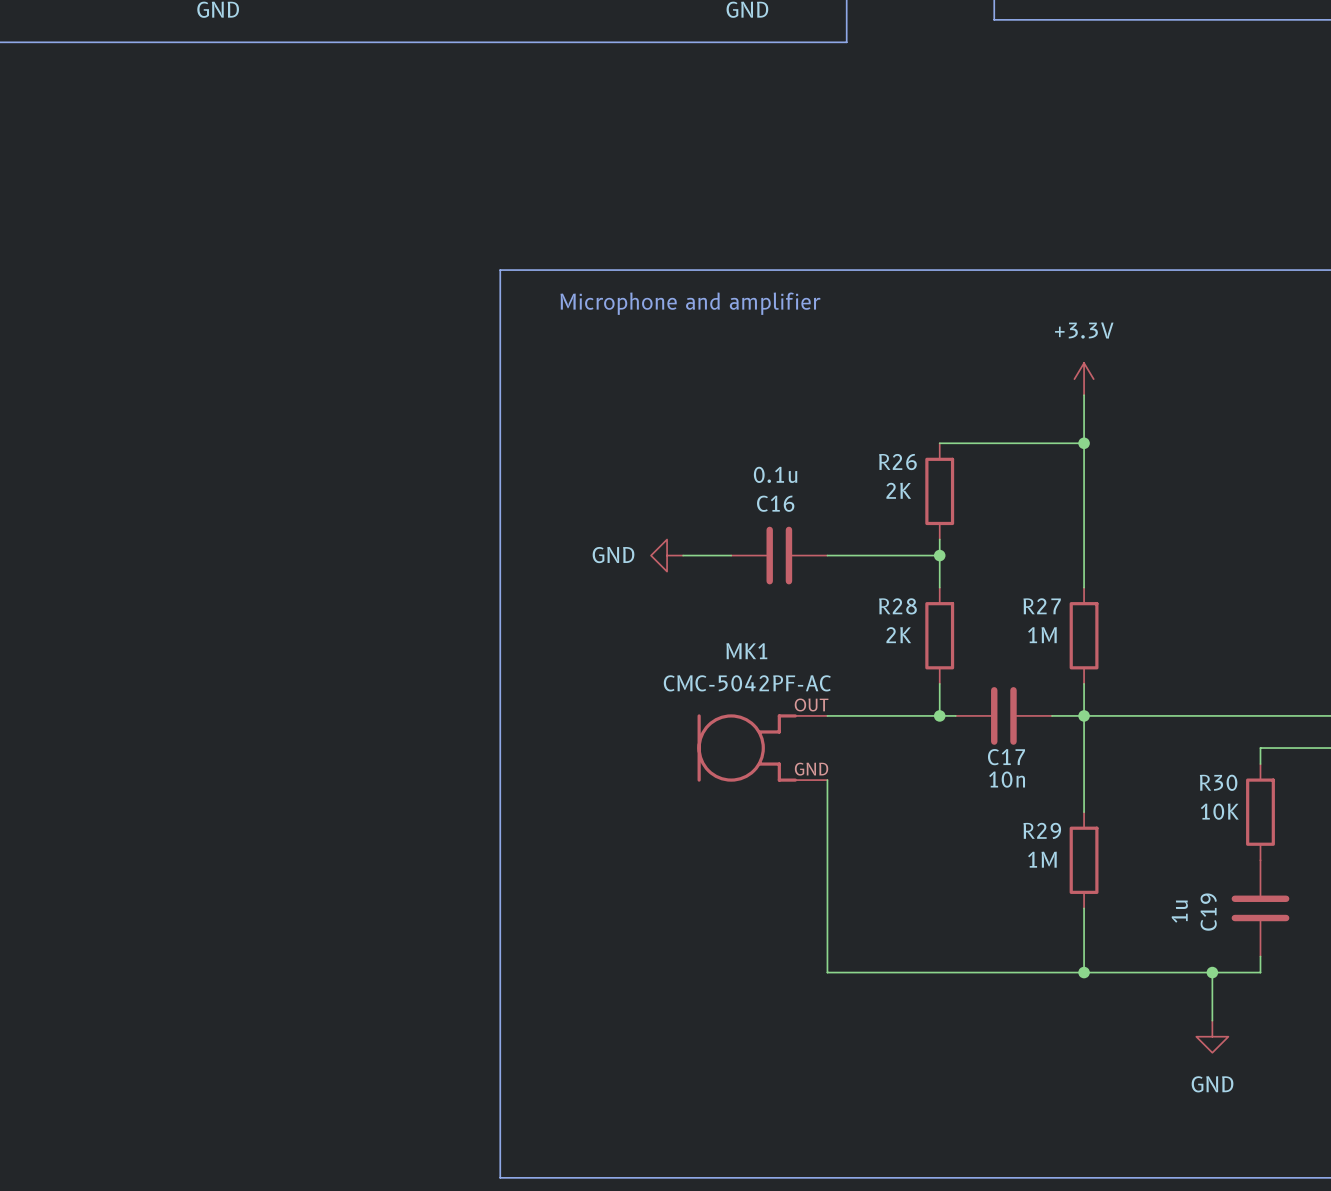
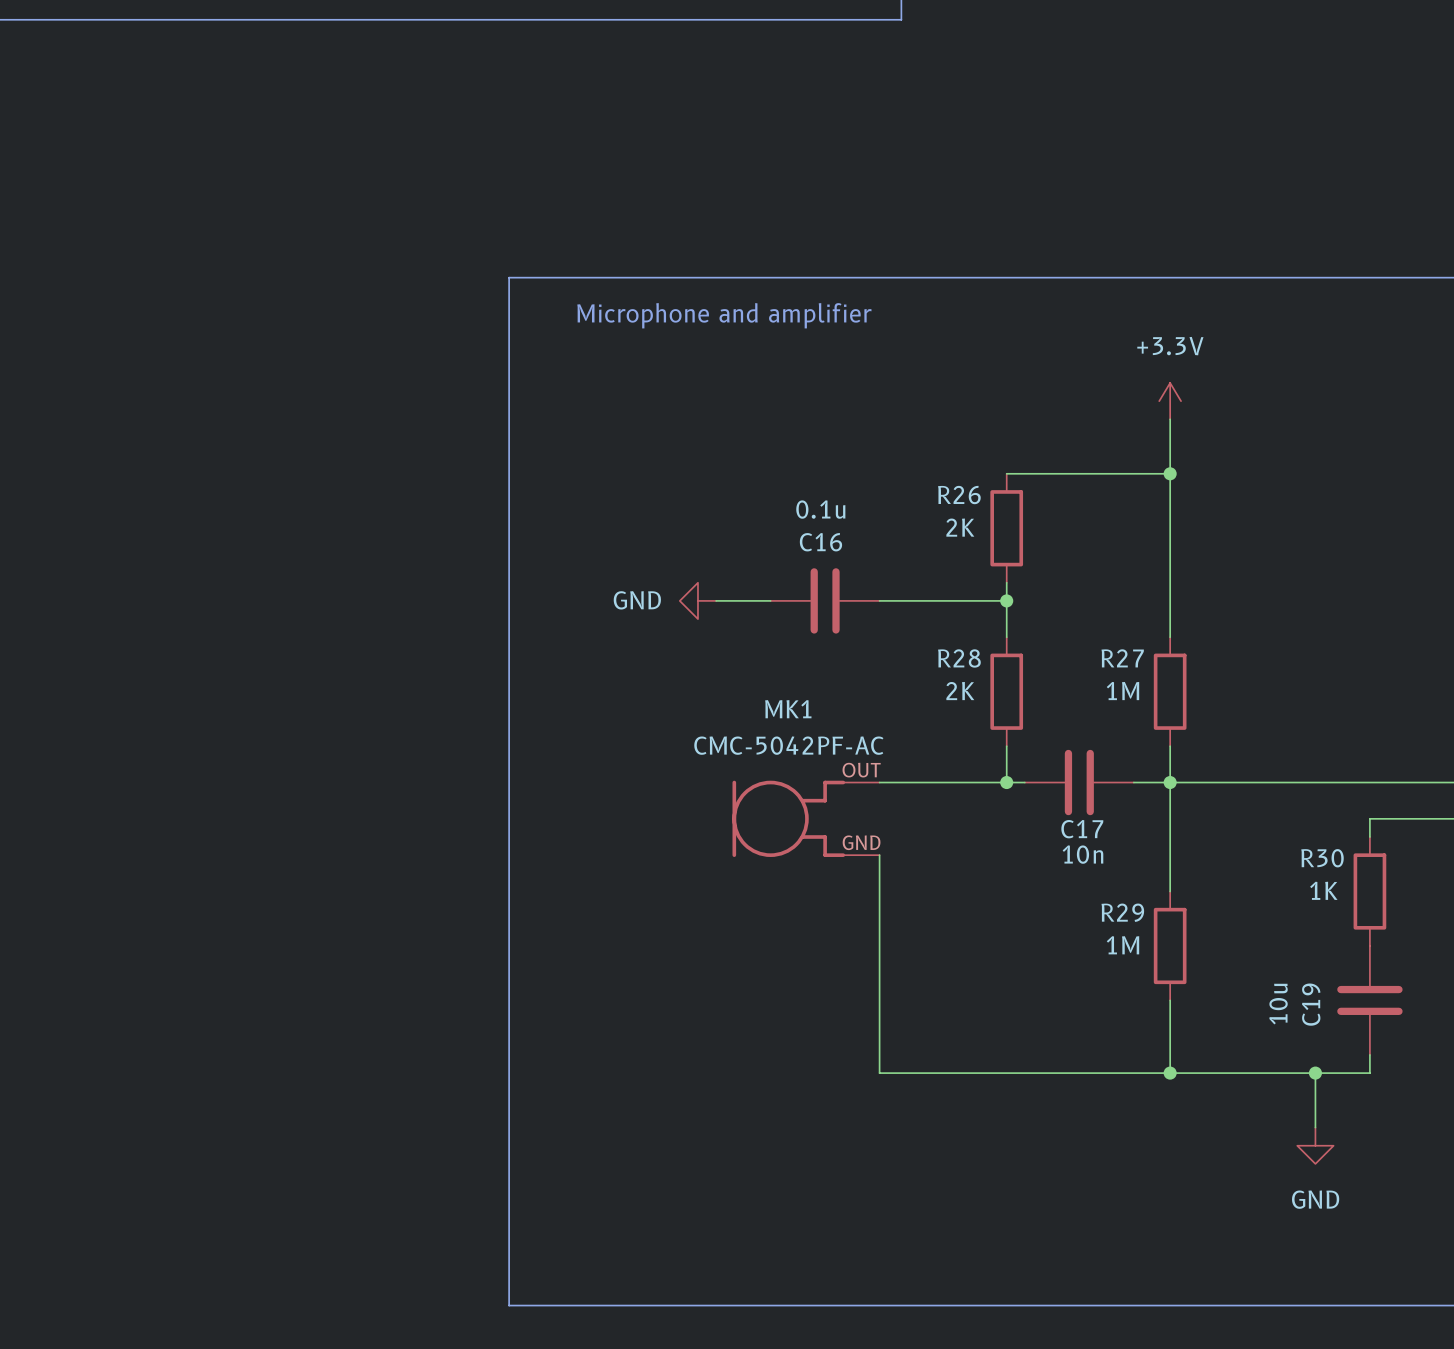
R30 value: 10K (1219, 811) -> 1K (1323, 890)
C19 value: 1u (1179, 911) -> 10u (1278, 1004)

